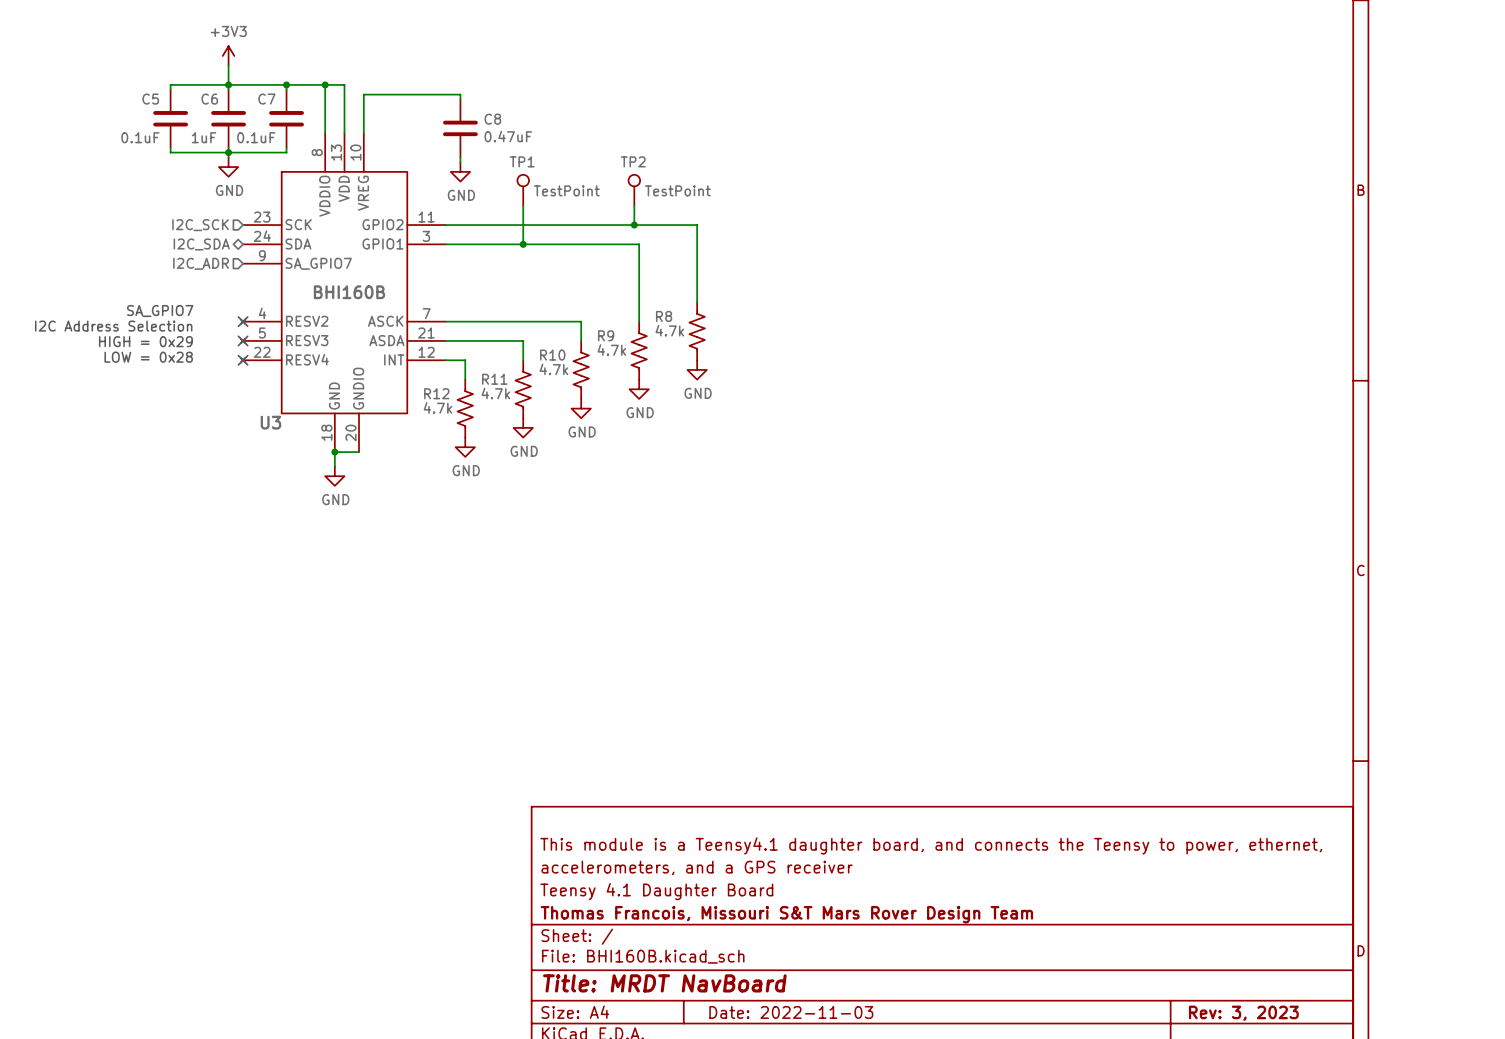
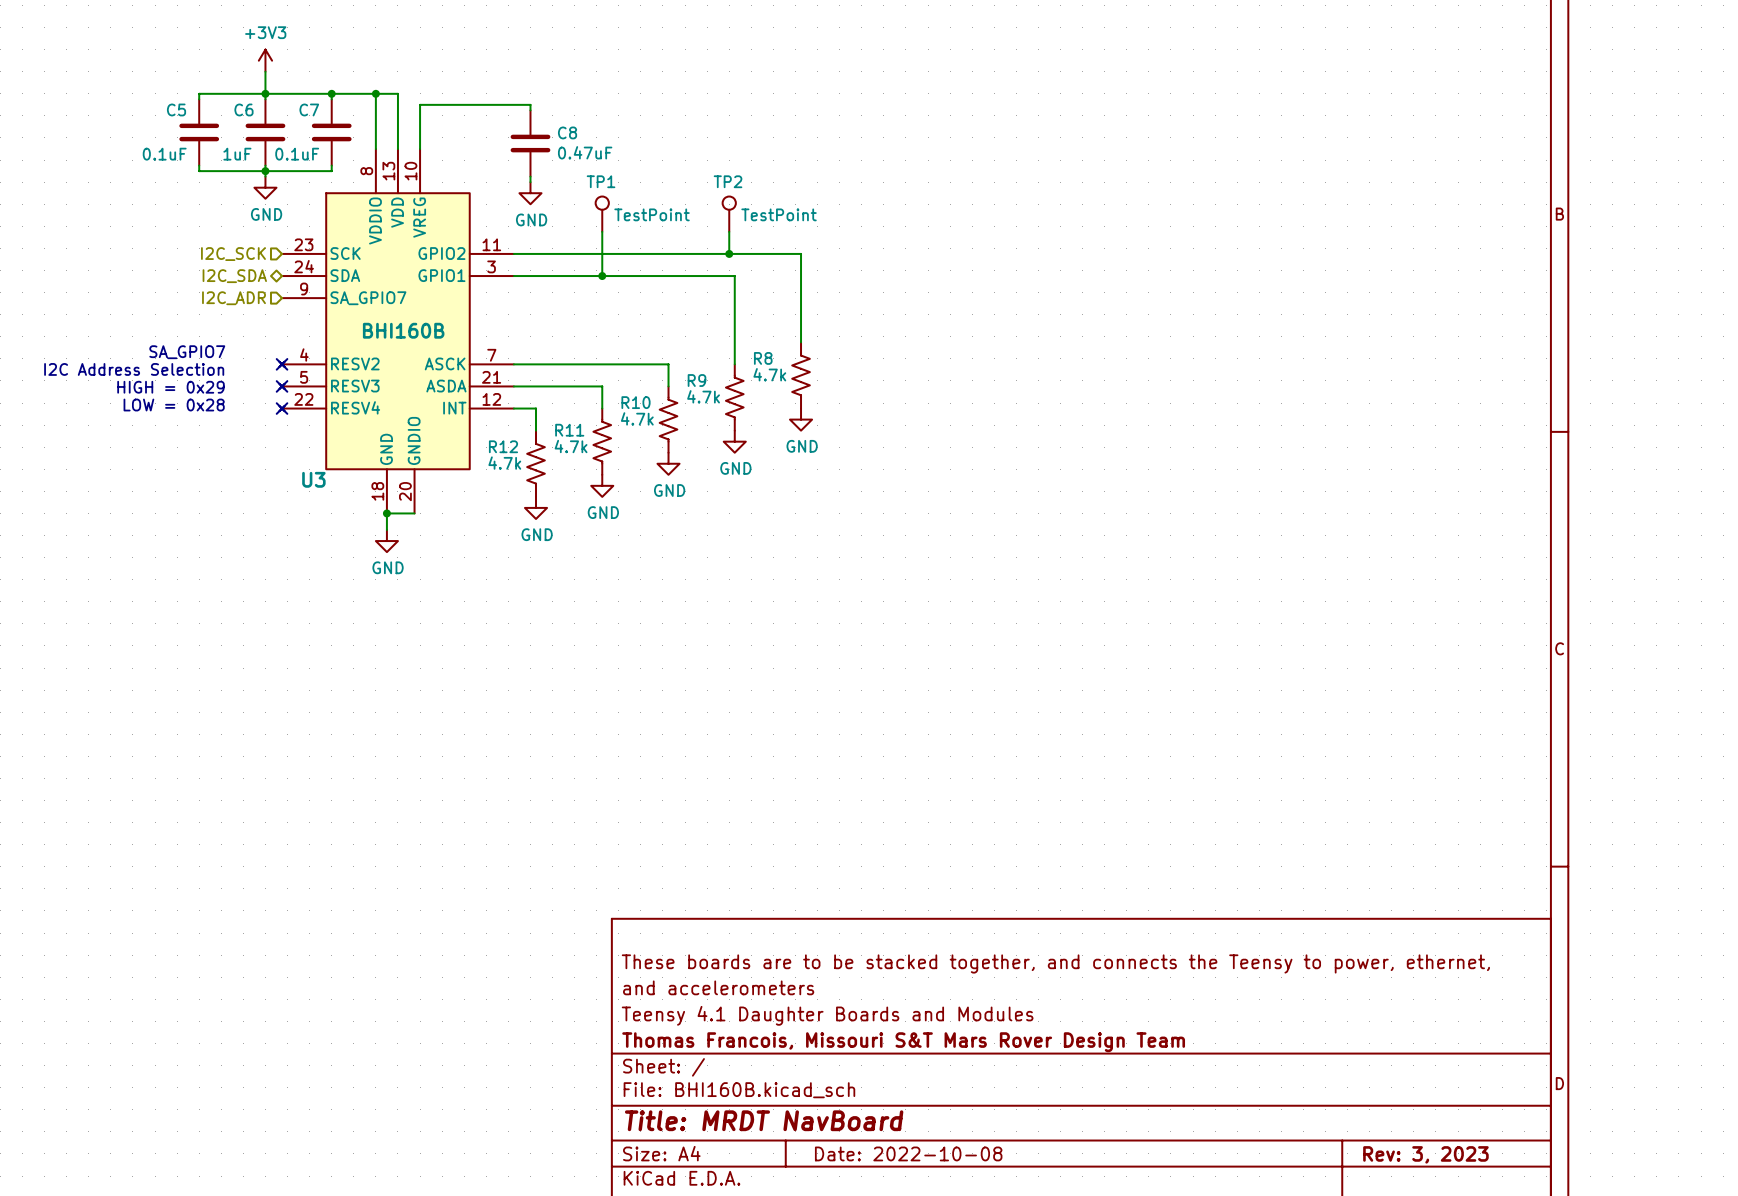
title block: This module is a Teensy4.1 daughter board, and connects the Teensy to power, ethernet, (931, 845) -> These boards are to be stacked together, and connects the Teensy to power, ethernet, (1055, 963)
title block: accelerometers, and a GPS receiver (697, 867) -> and accelerometers (718, 987)
title block: Teensy 4.1 Daughter Board (656, 891) -> Teensy 4.1 Daughter Boards and Modules (827, 1015)
title block: Date: 2022-11-03 (791, 1012) -> Date: 2022-10-08 (908, 1153)

